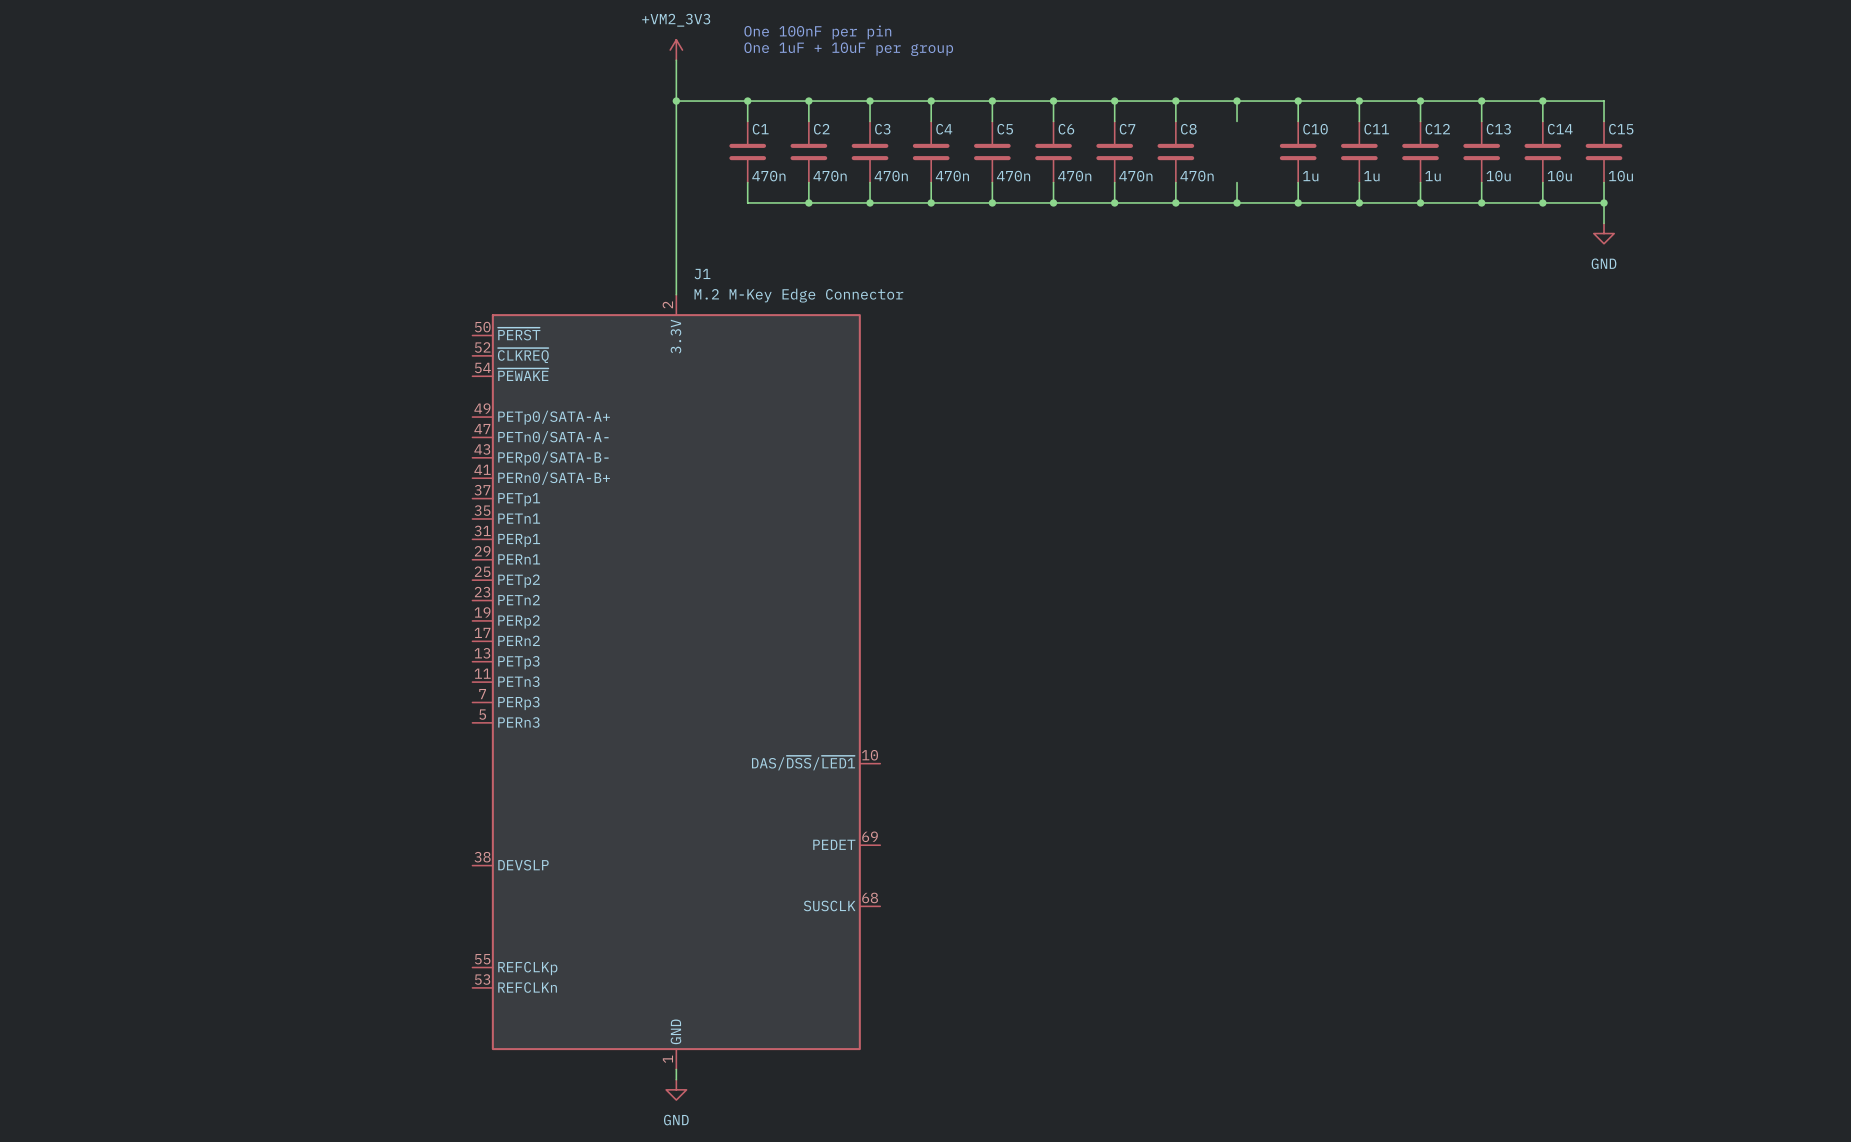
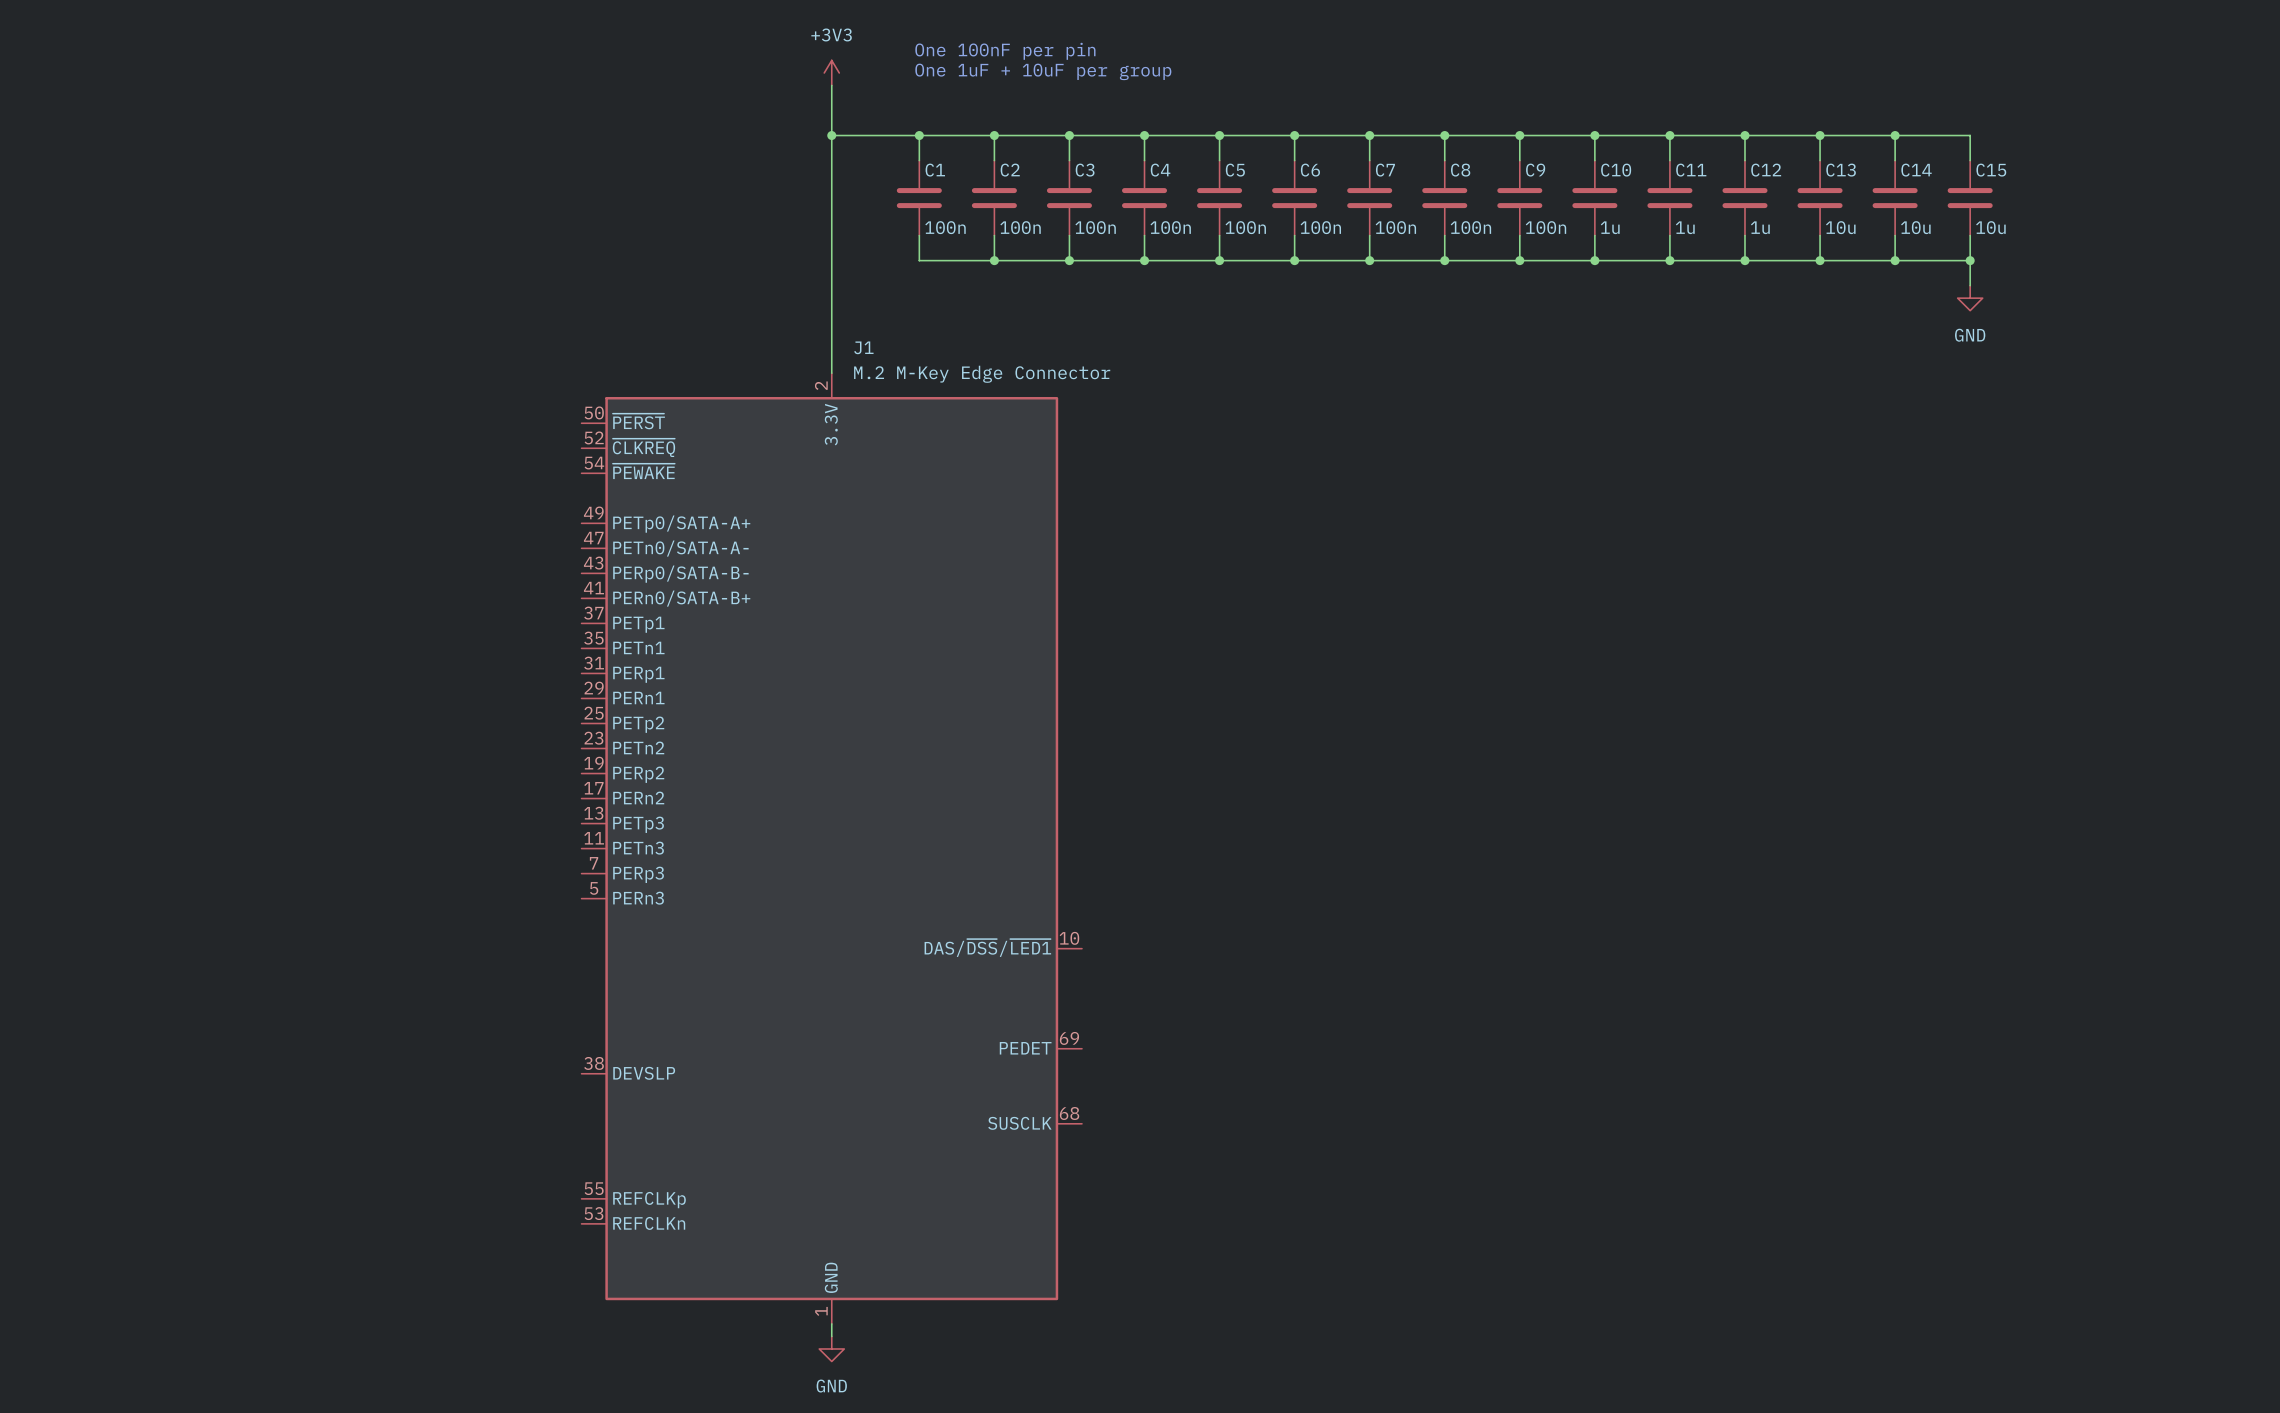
power symbol: +VM2_3V3 (676, 50) -> +3V3 (831, 72)
C9: none -> 100n (1519, 198)
C1 value: 470n (768, 176) -> 100n (945, 227)
C2 value: 470n (830, 176) -> 100n (1020, 227)
C3 value: 470n (891, 176) -> 100n (1095, 227)
C4 value: 470n (952, 176) -> 100n (1170, 227)
C5 value: 470n (1013, 176) -> 100n (1245, 227)
C6 value: 470n (1074, 176) -> 100n (1320, 227)
C7 value: 470n (1135, 176) -> 100n (1395, 227)
C8 value: 470n (1197, 176) -> 100n (1470, 227)

